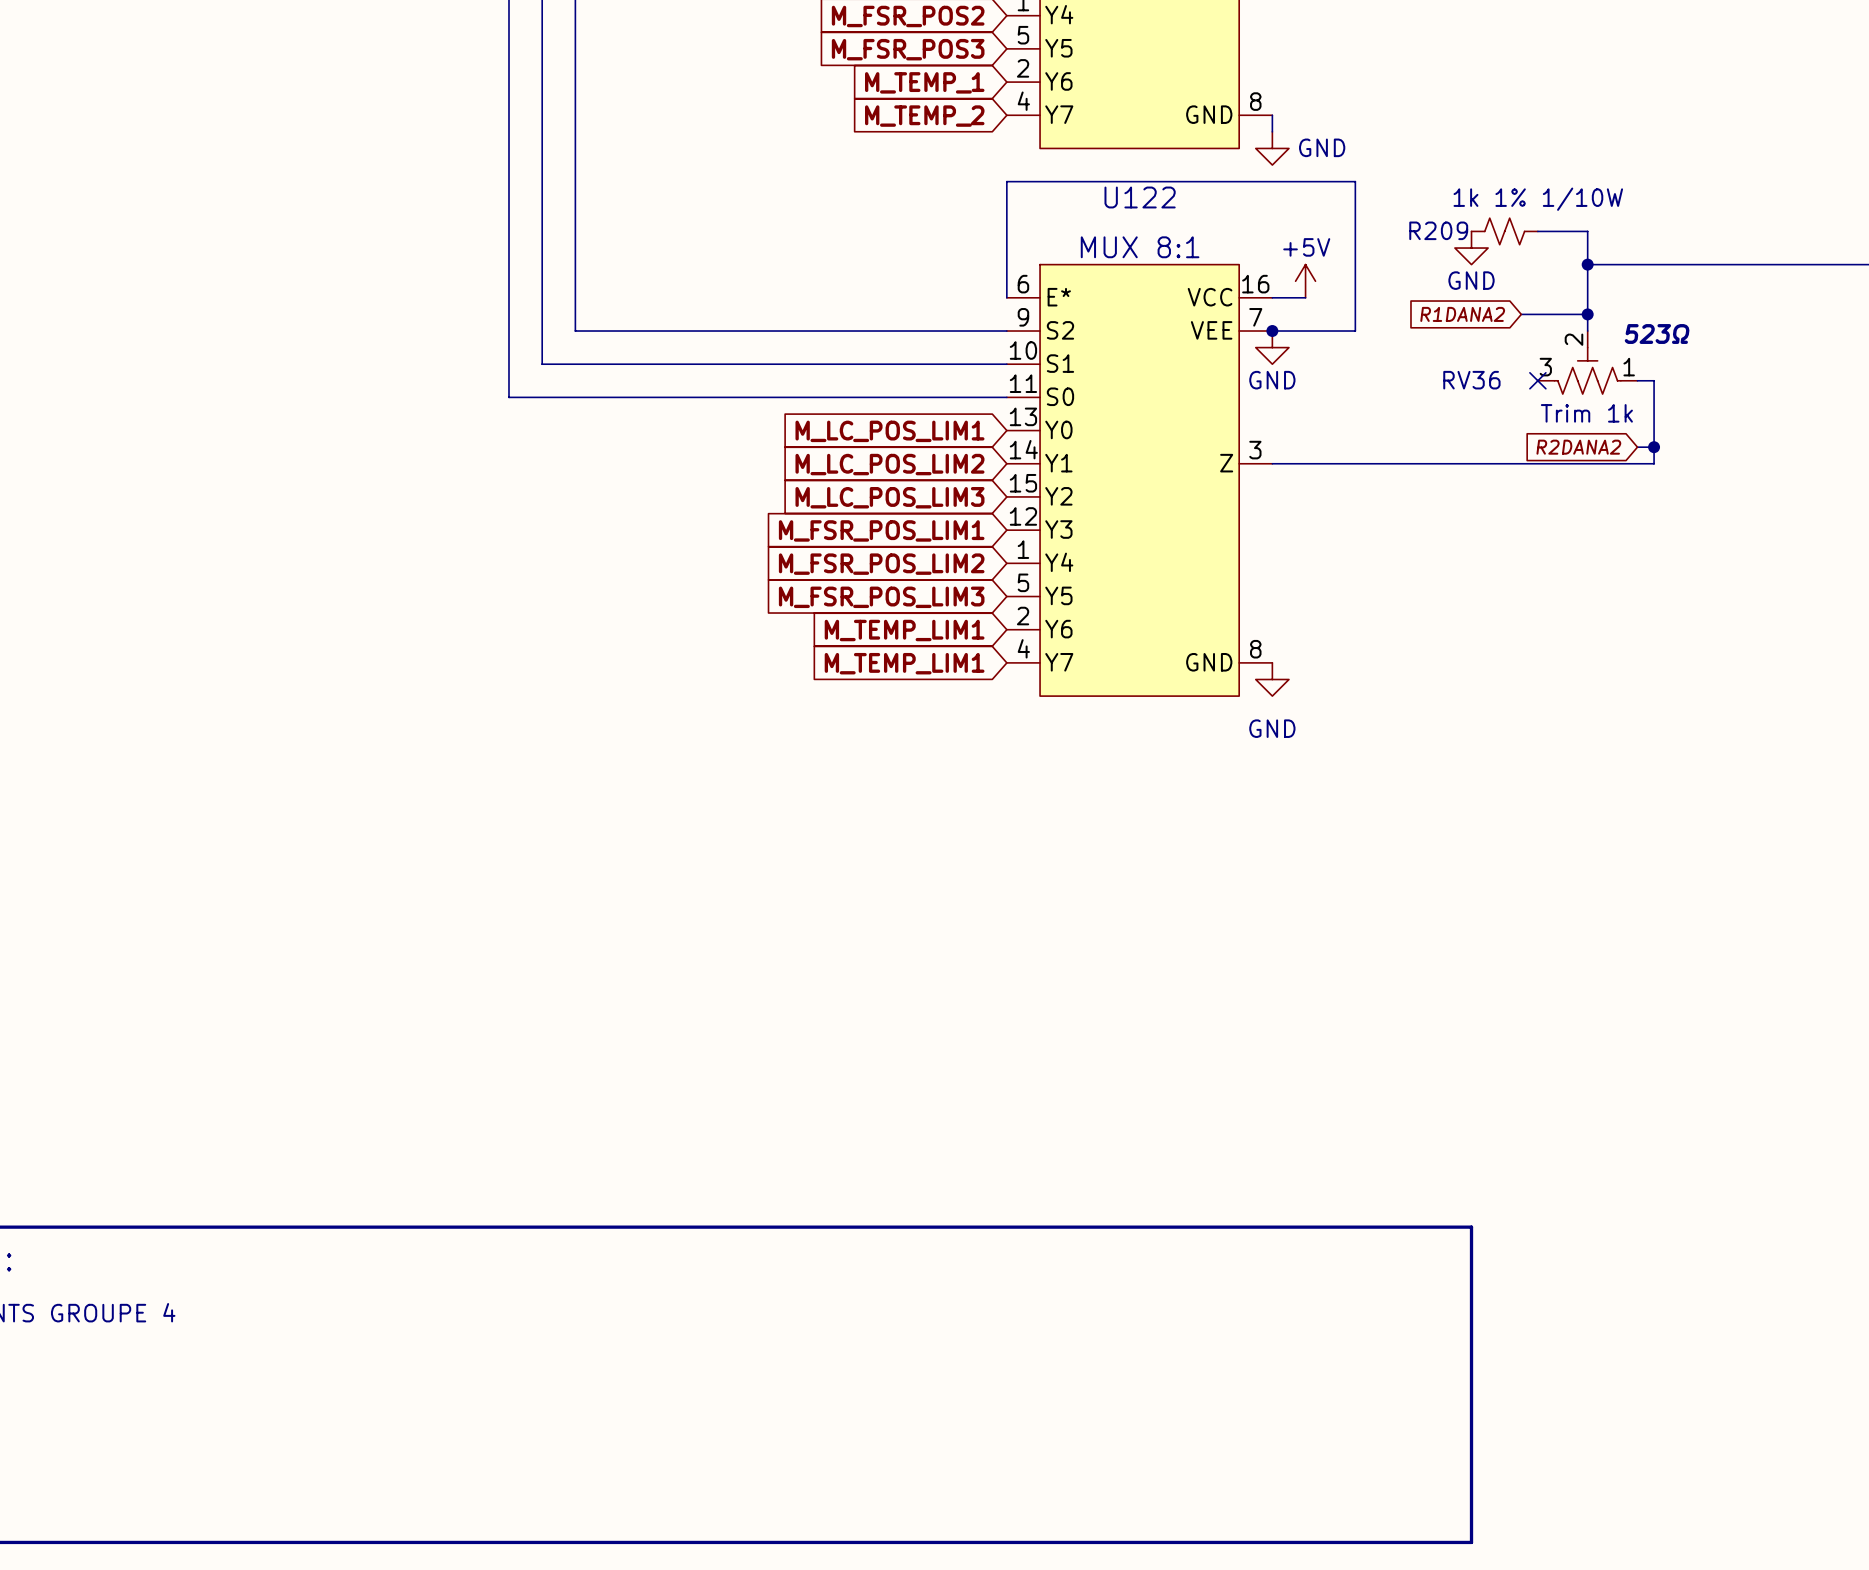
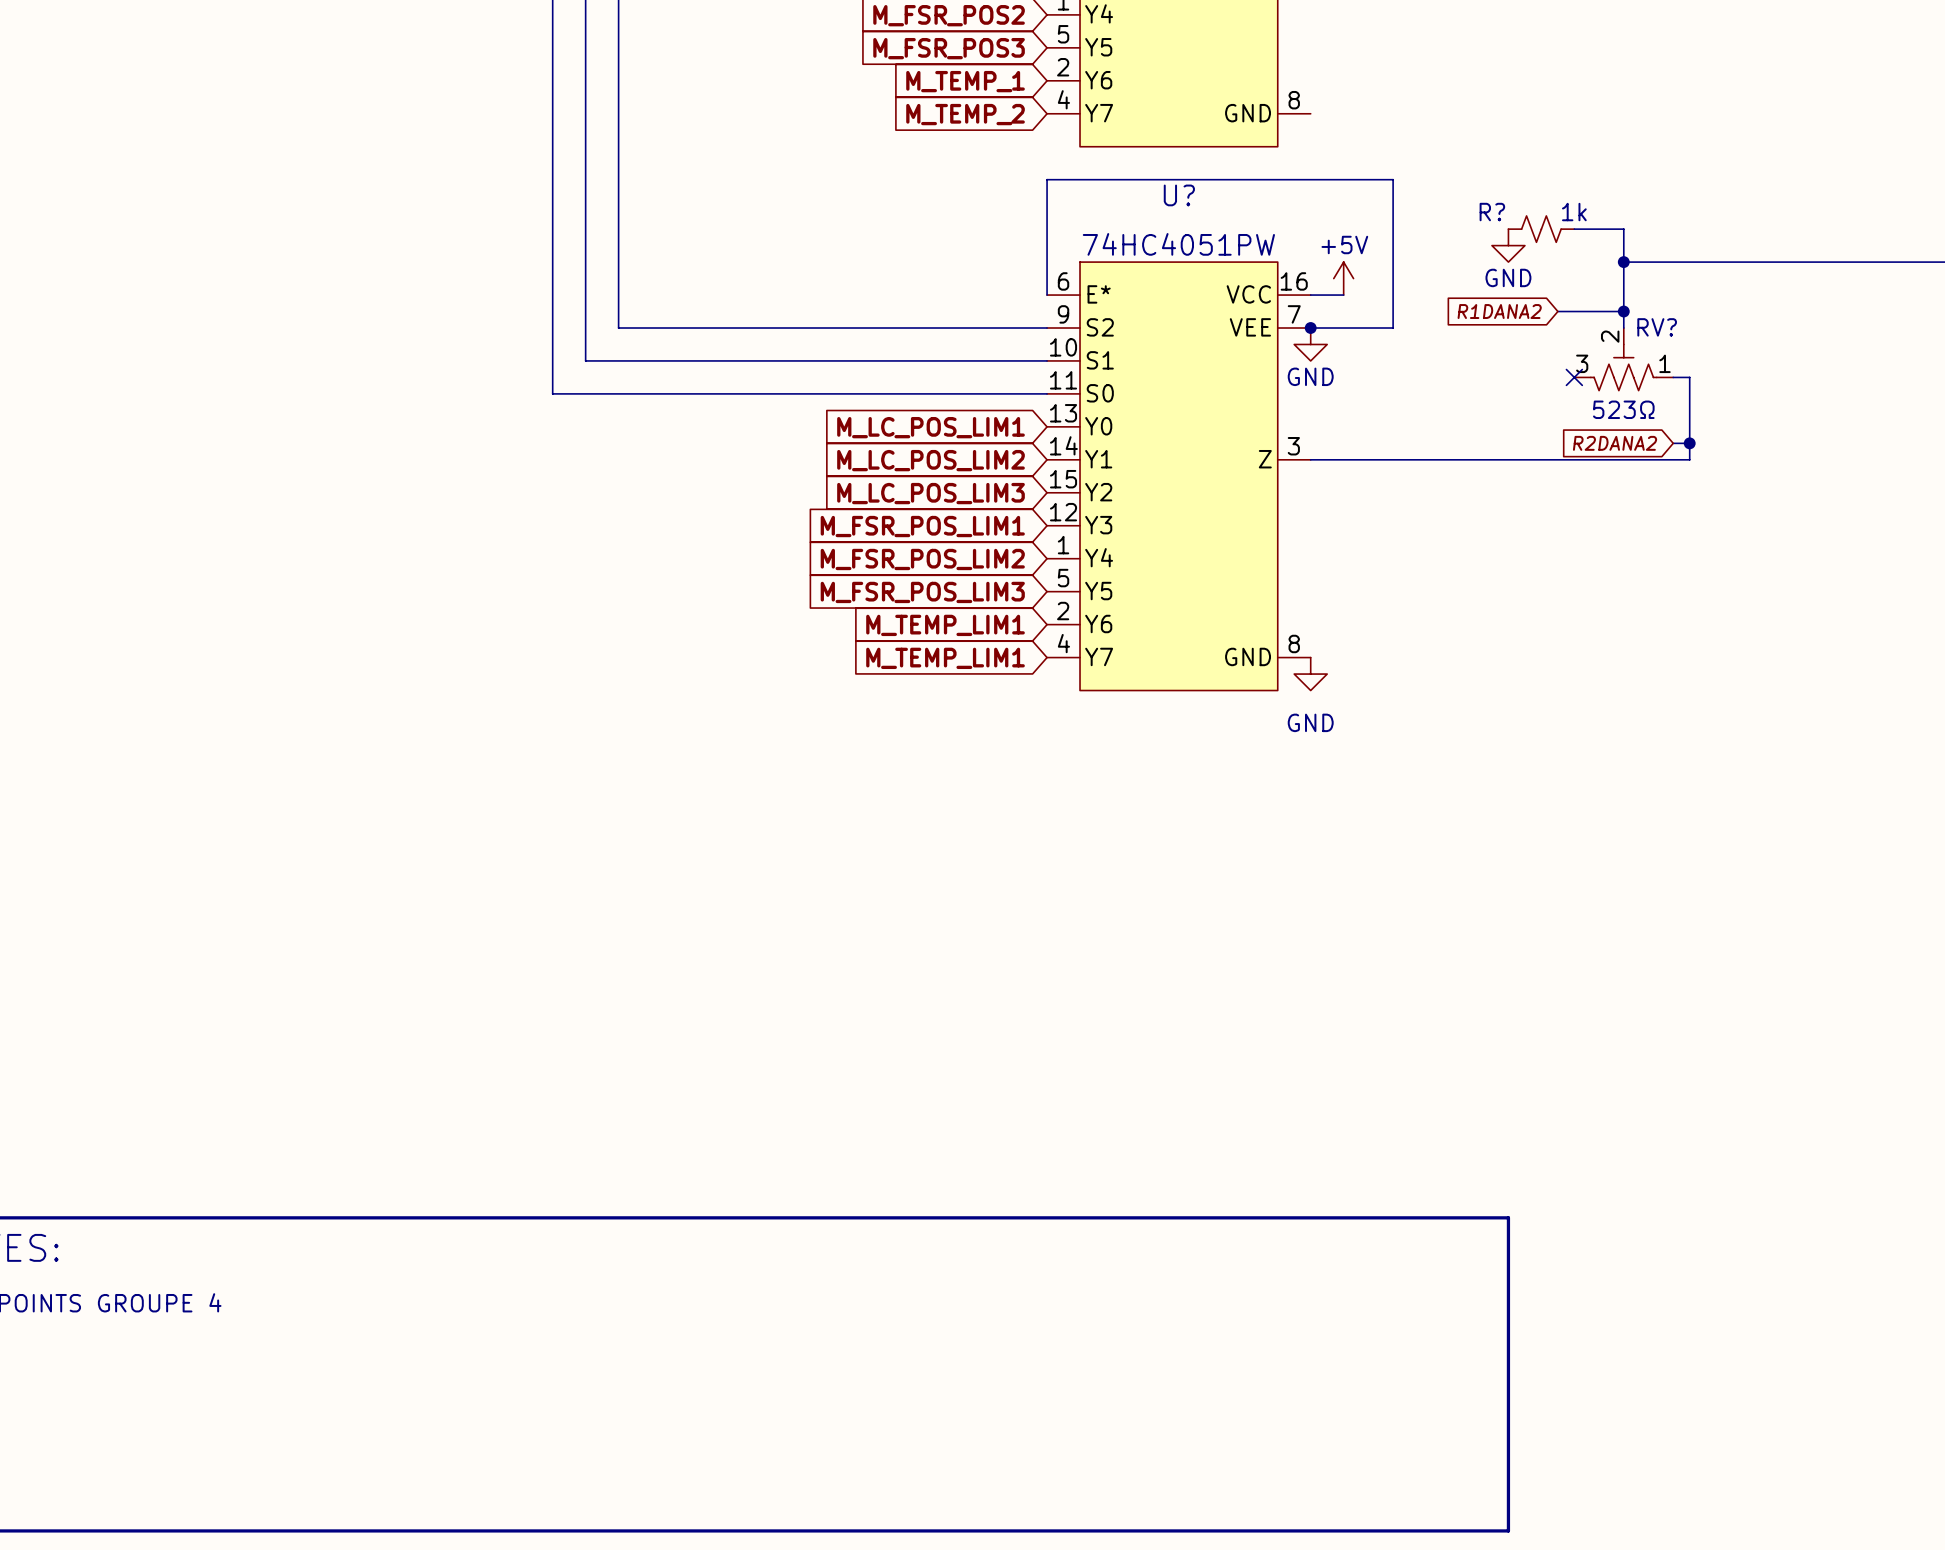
wire: (1272, 115) (1272, 131) -> none
power symbol: GND (1272, 148) -> none
U122 name: U122 (1140, 197) -> U? (1179, 195)
R209 value: 1k 1% 1/10W (1538, 199) -> 1k (1574, 212)
R209 name: R209 (1438, 230) -> R? (1492, 212)
U122 value: MUX 8:1 (1140, 247) -> 74HC4051PW (1178, 244)
text: 523Ω (1657, 334) -> none
RV36 name: RV36 (1471, 380) -> RV? (1657, 327)
RV36 value: Trim 1k (1586, 413) -> 523Ω (1623, 409)

